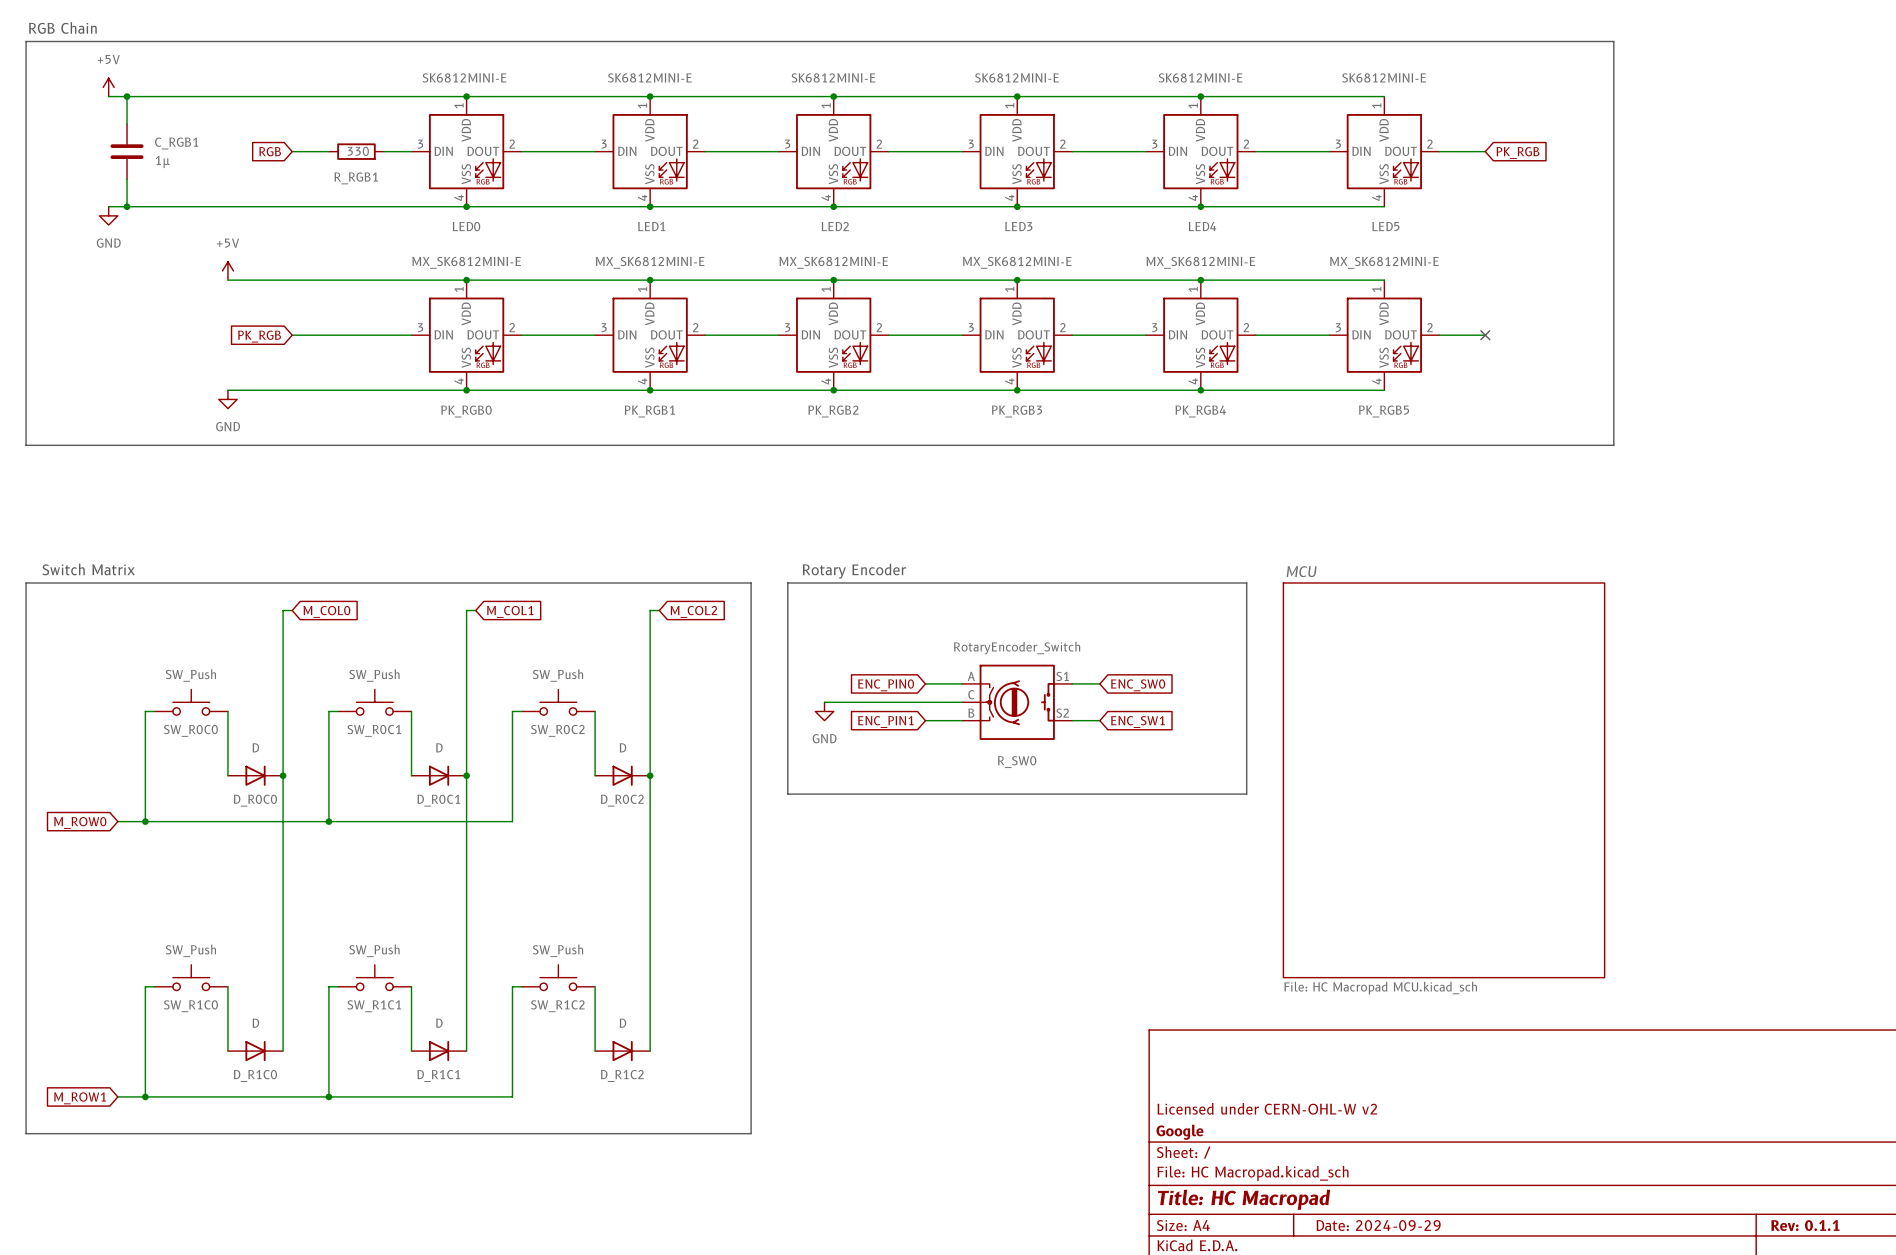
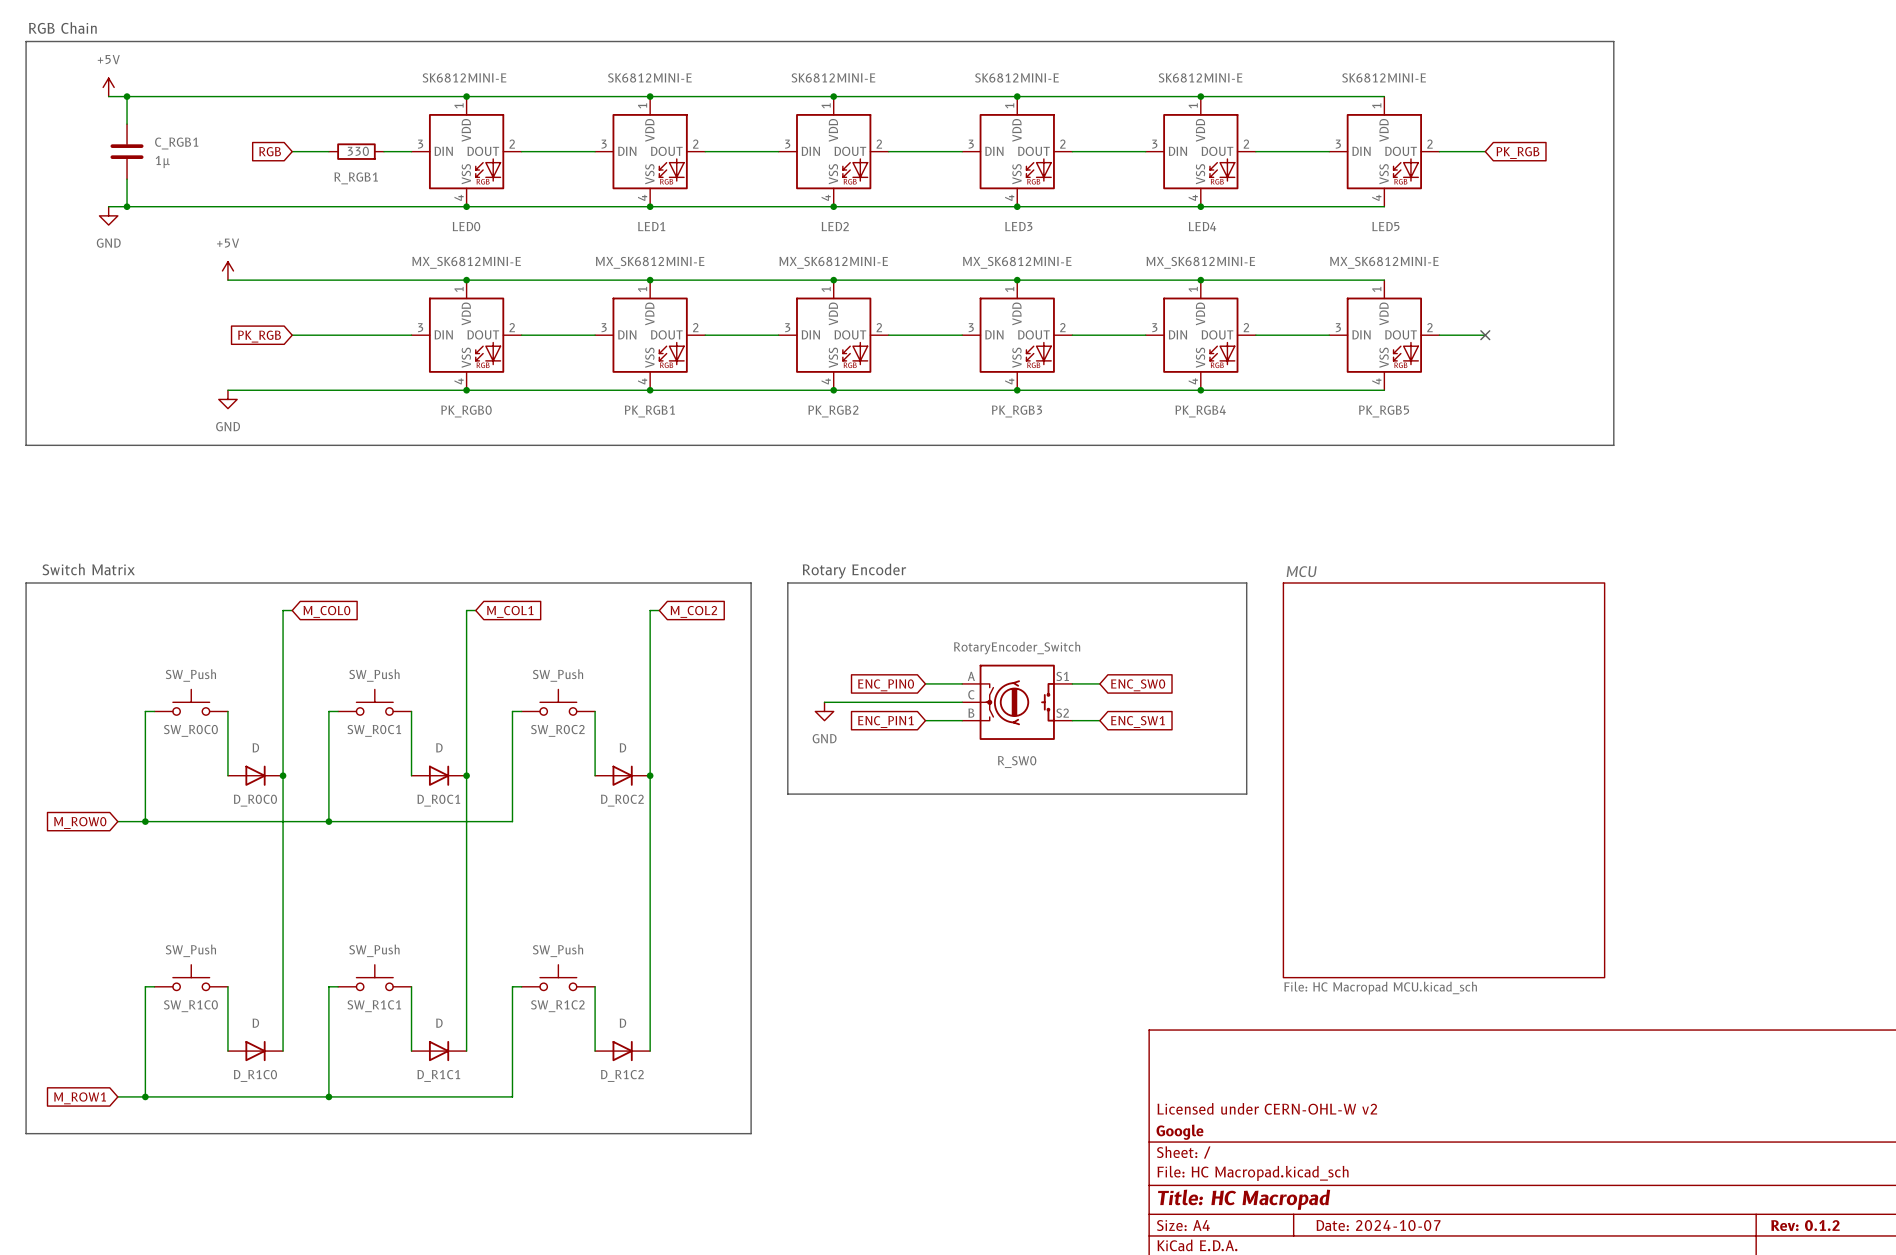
title block: Date: 2024-09-29 (1378, 1225) -> Date: 2024-10-07 (1378, 1225)
title block: Rev: 0.1.1 (1805, 1225) -> Rev: 0.1.2 (1805, 1225)

